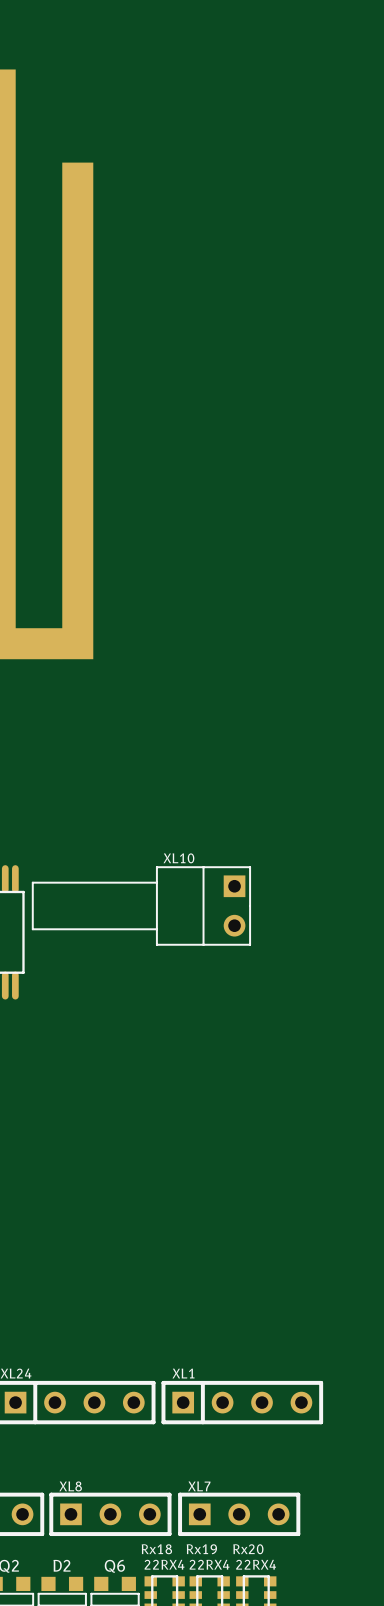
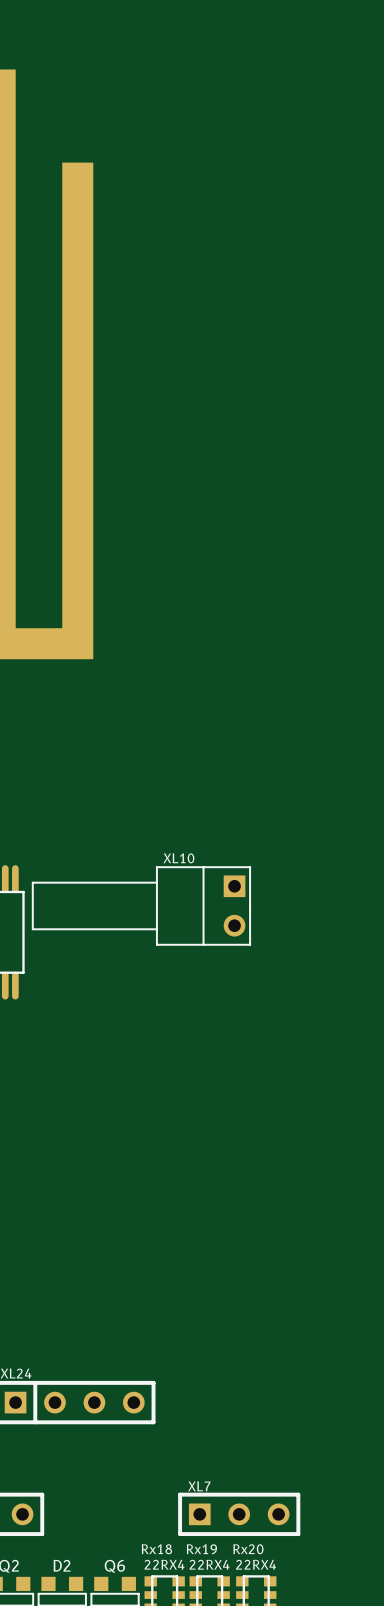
XL1: (242, 1402) -> none
XL8: (110, 1514) -> none

